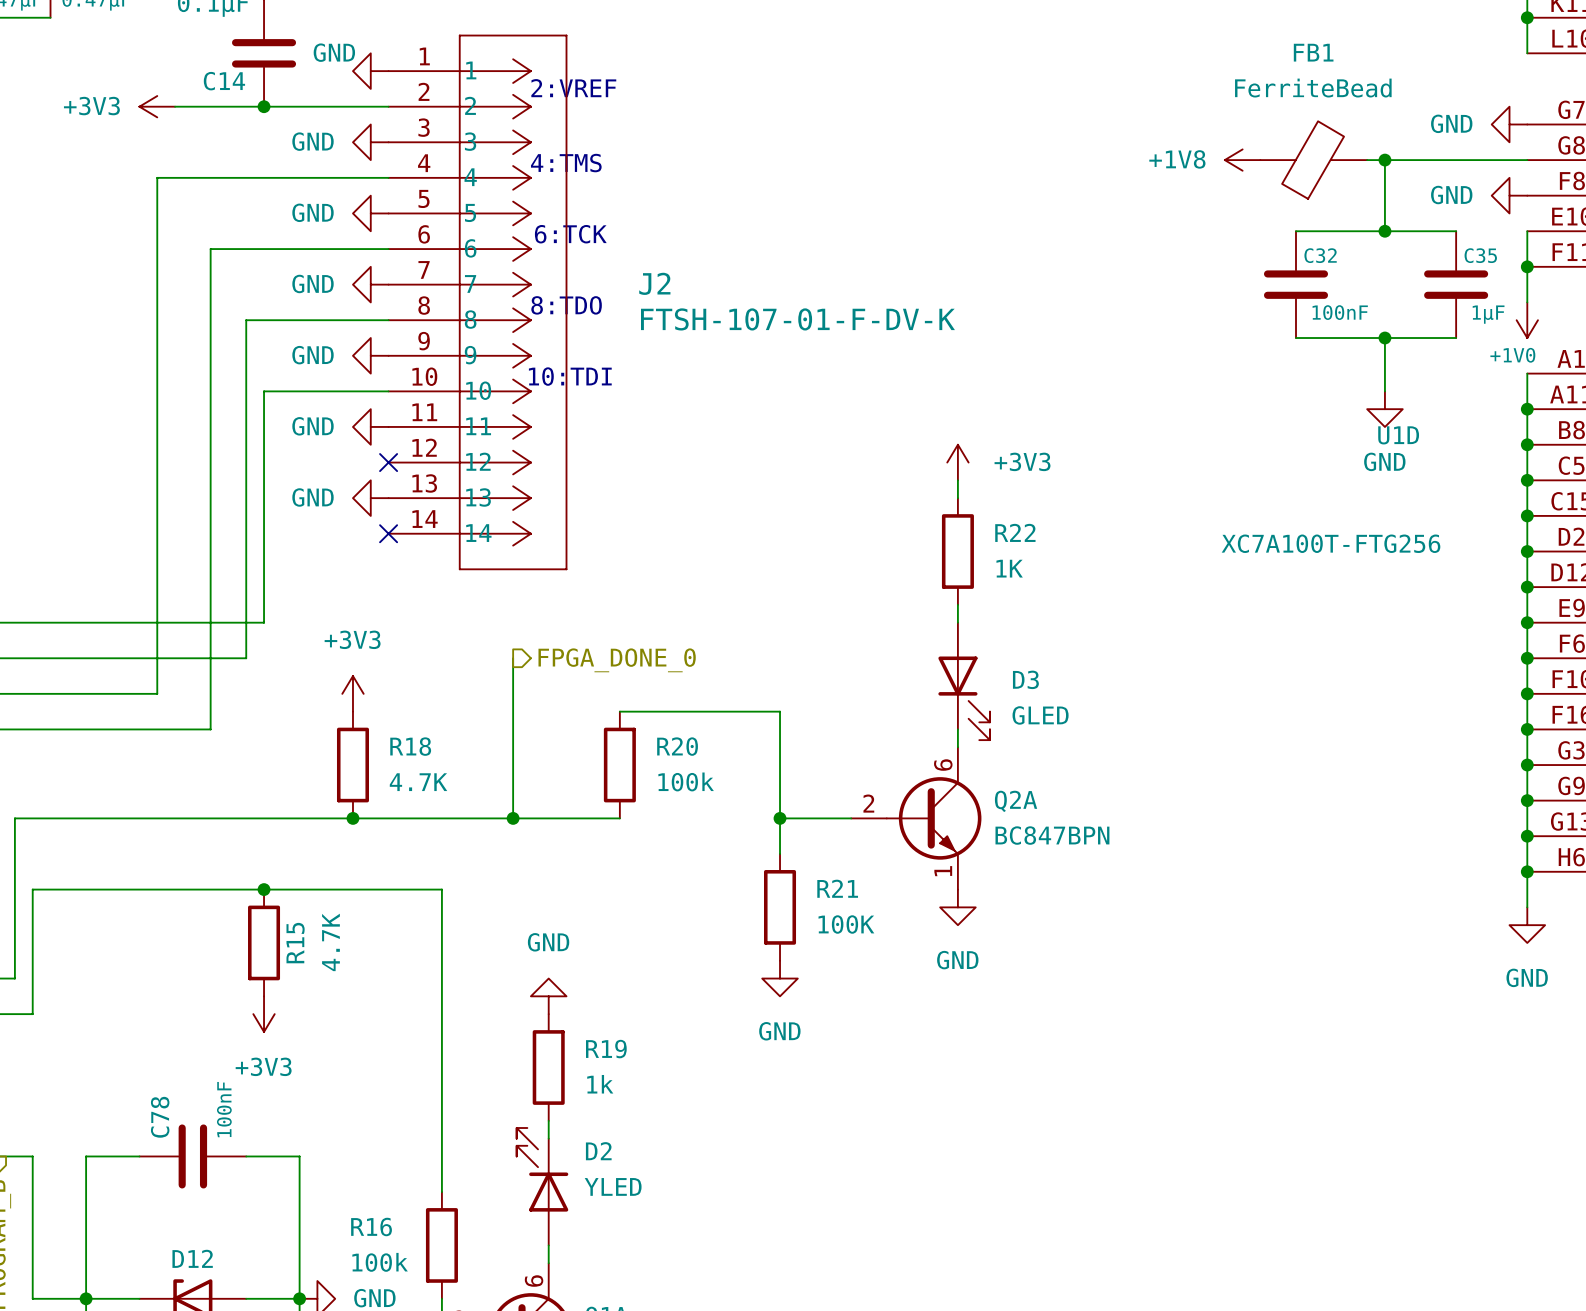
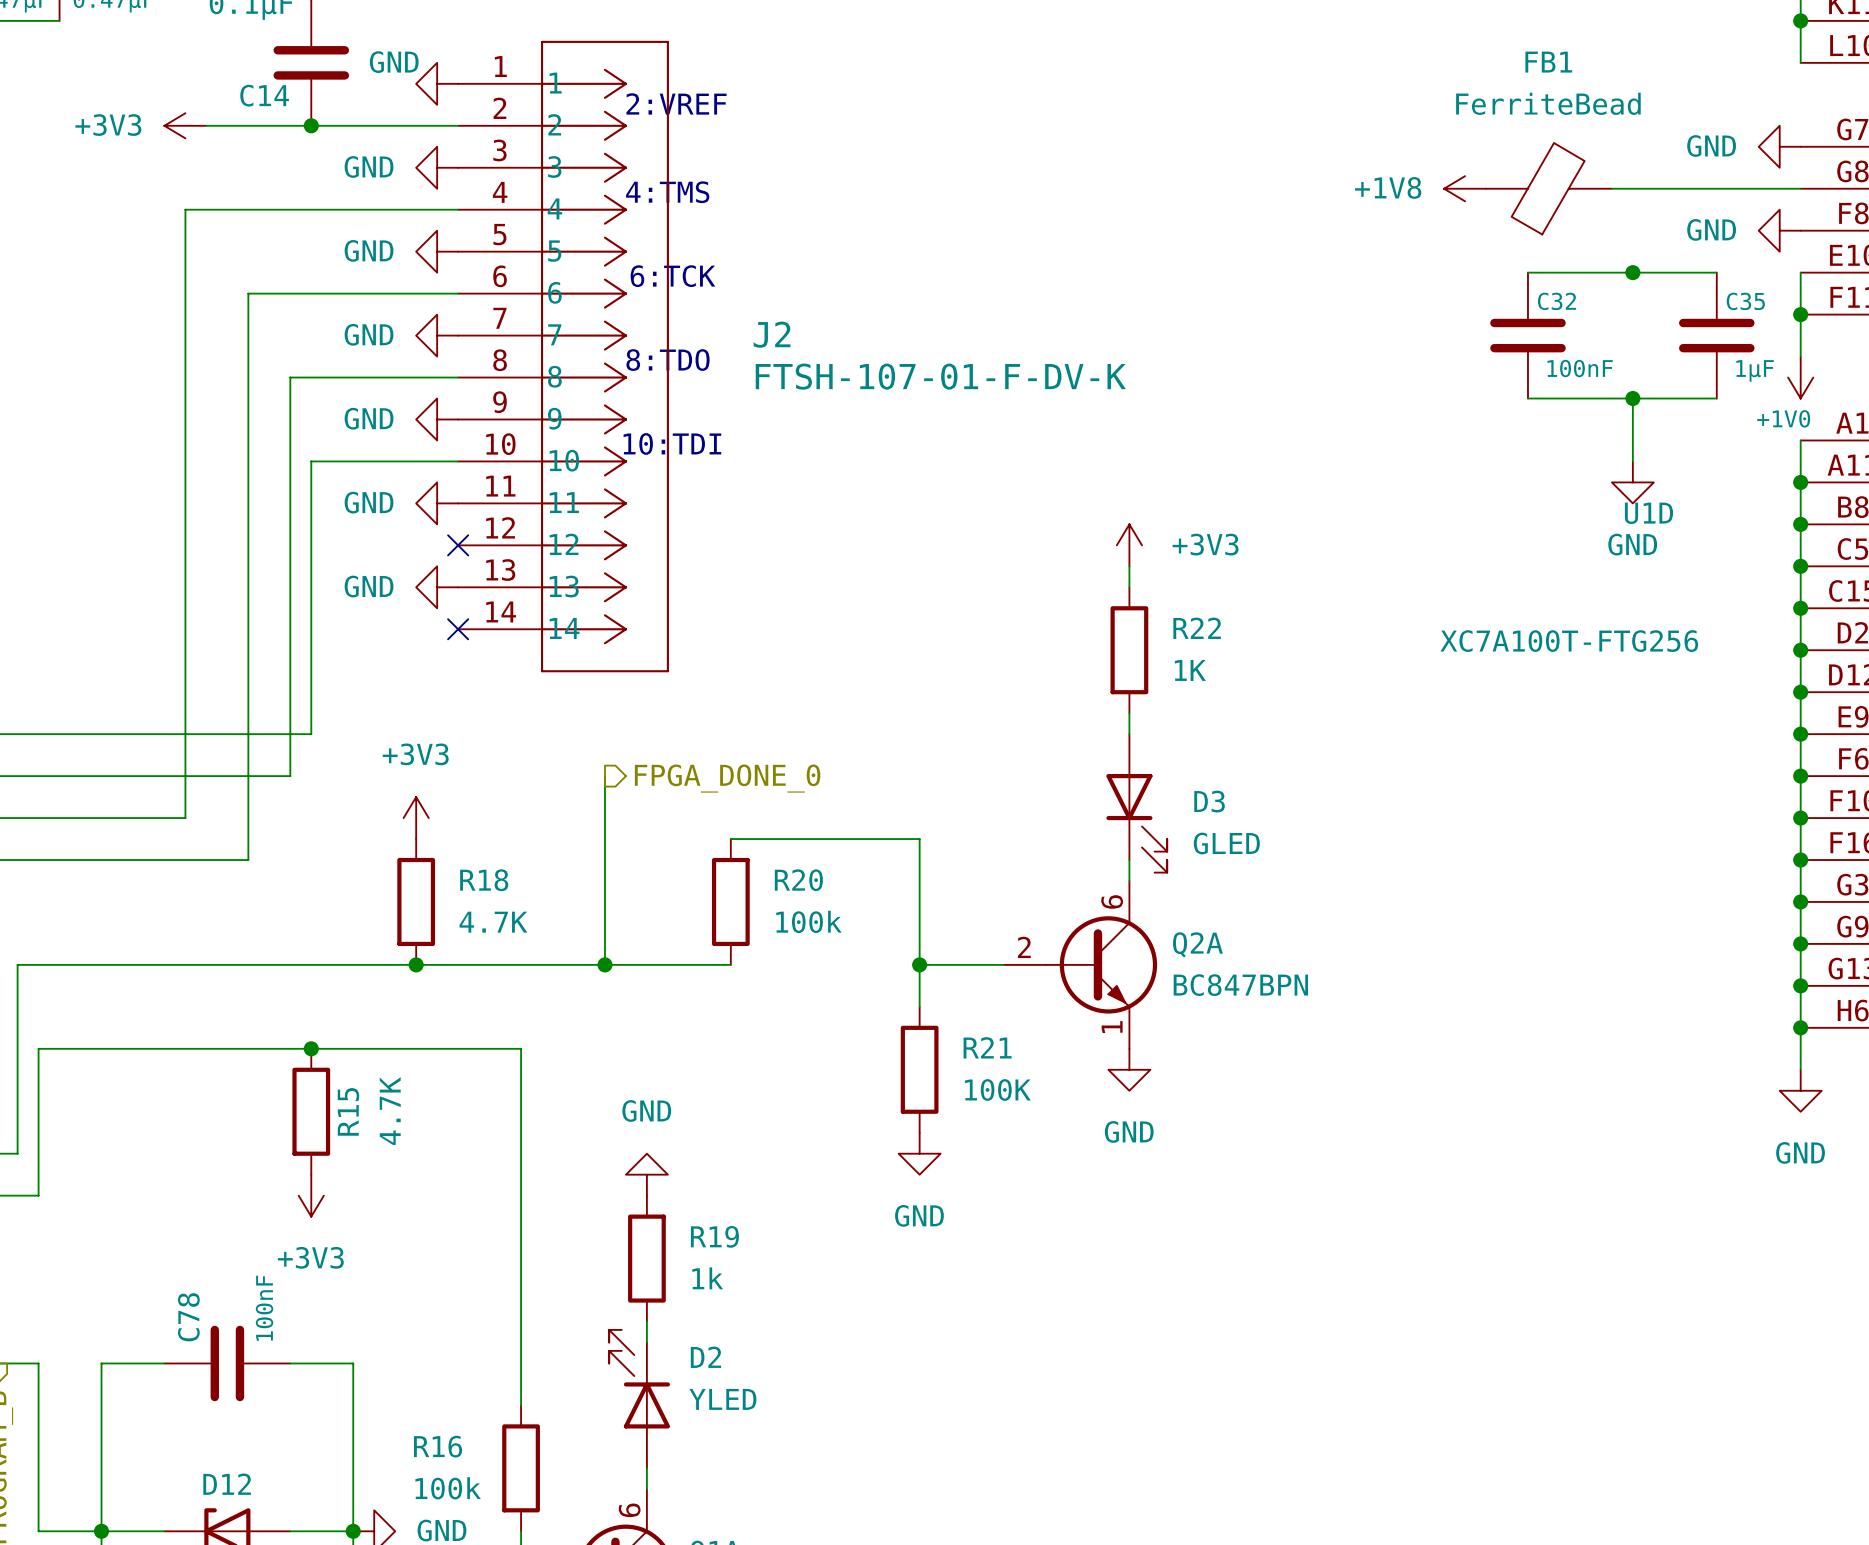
wire: (1384, 160) (1384, 231) -> none
junction: (1384, 160) -> none

